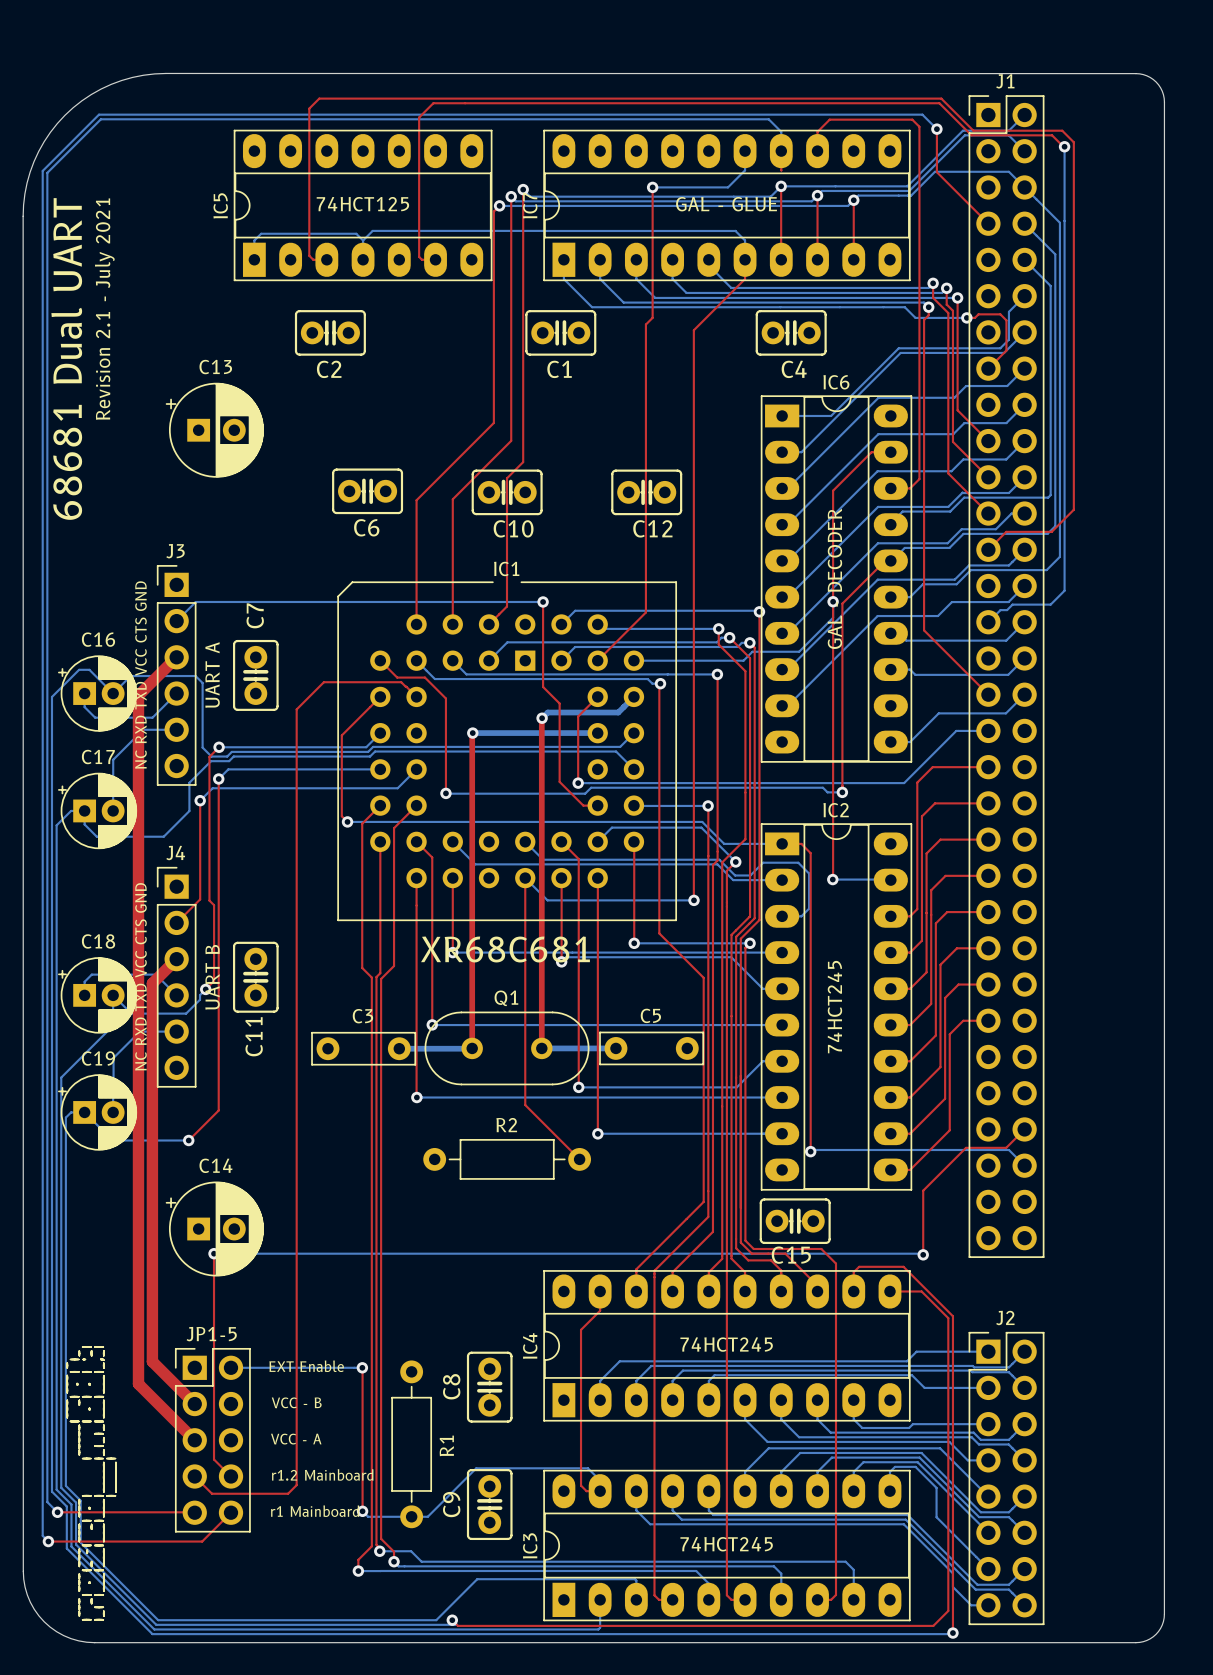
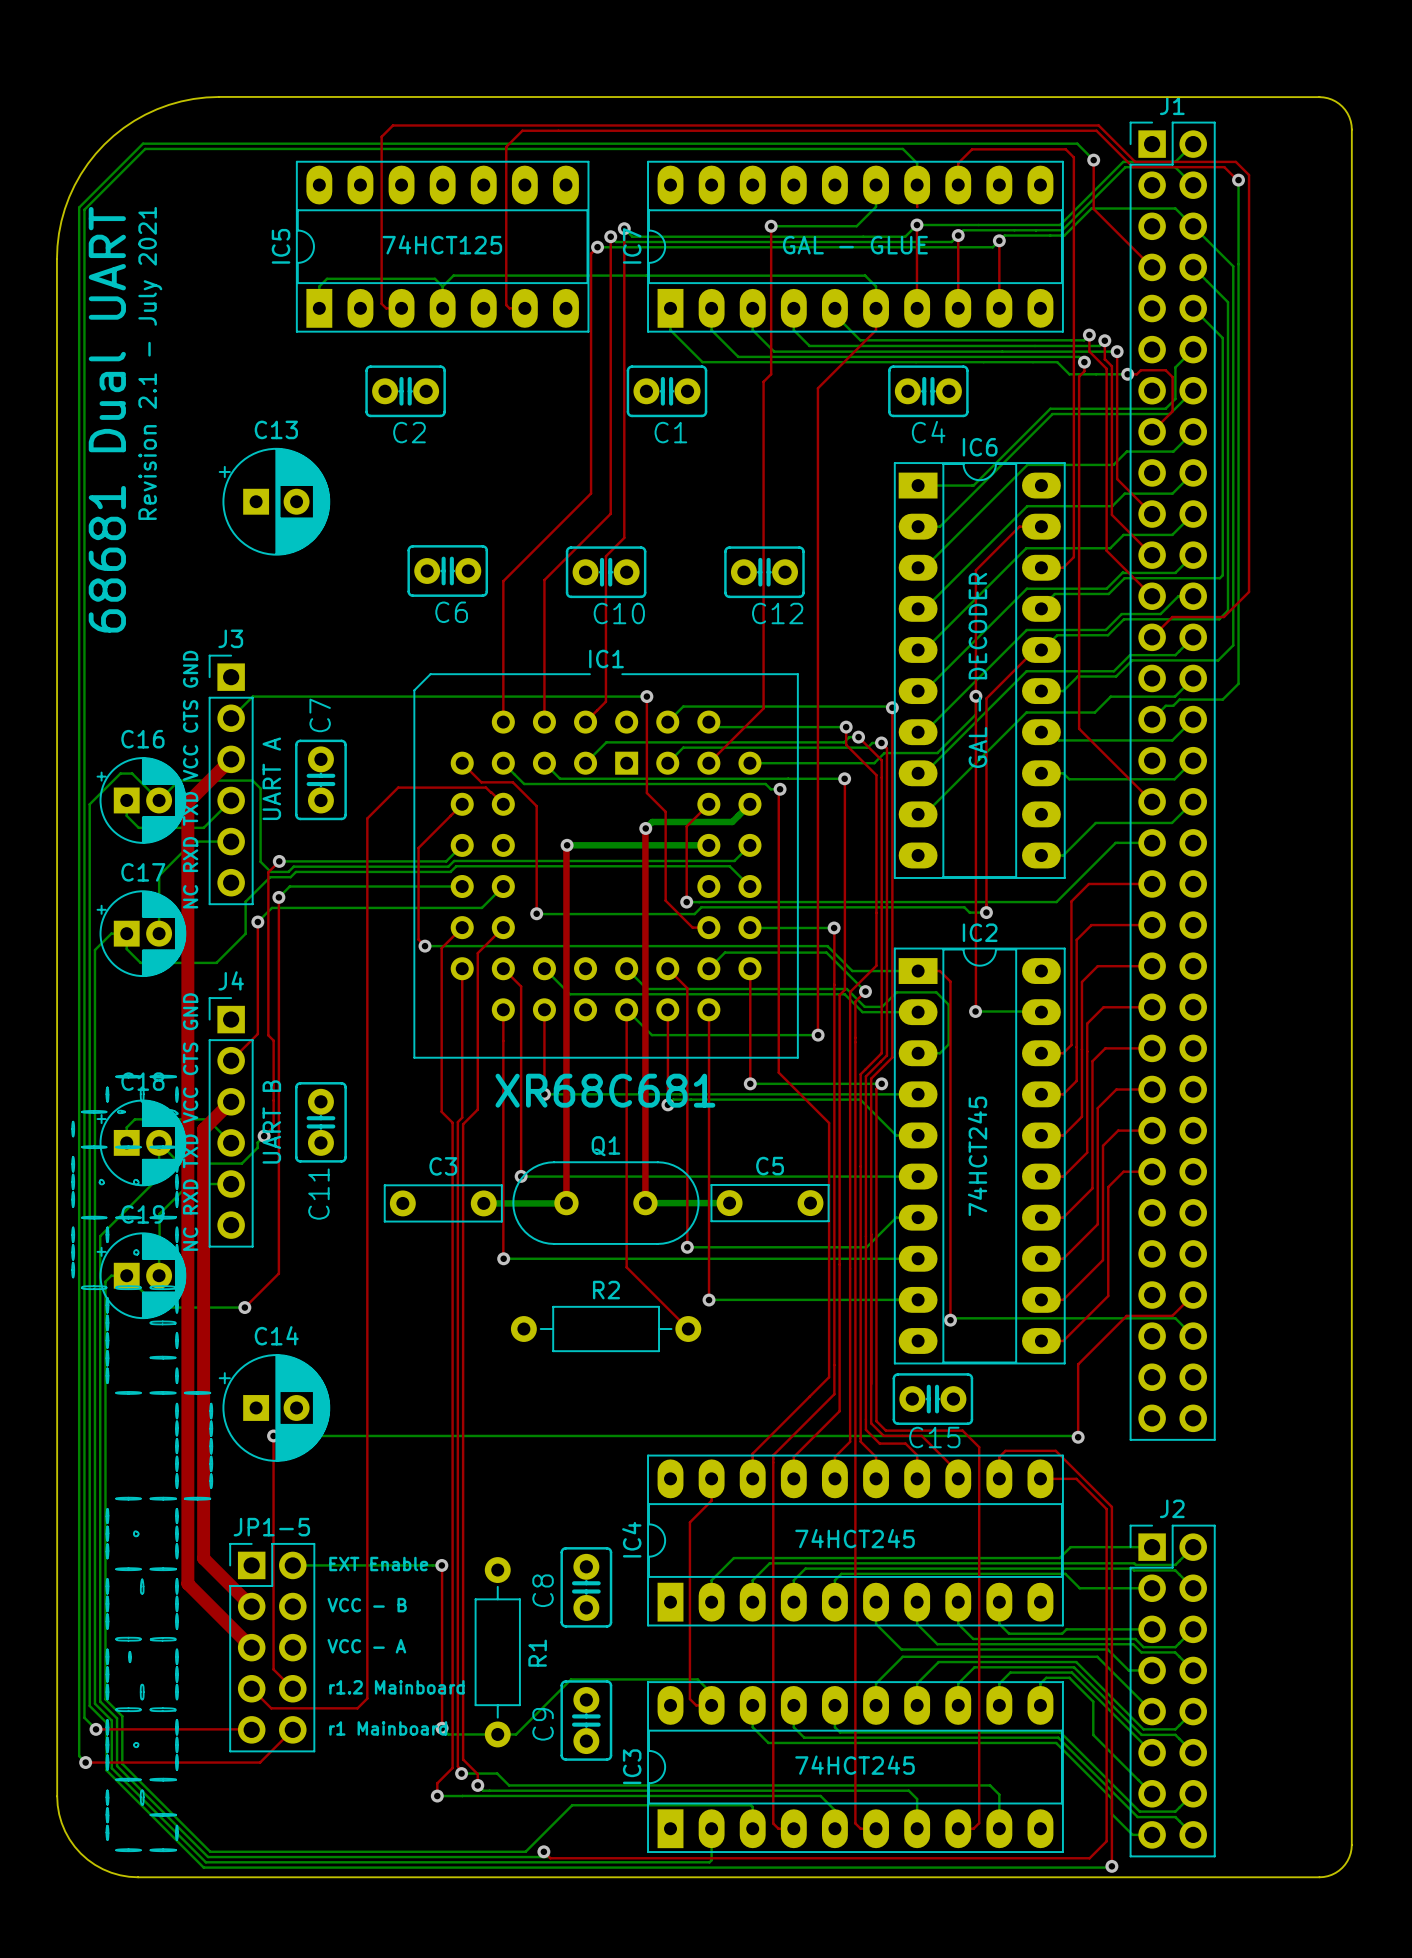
drawing: none -> [72, 1075, 213, 1852]
drawing: [66, 1346, 117, 1621] -> none

